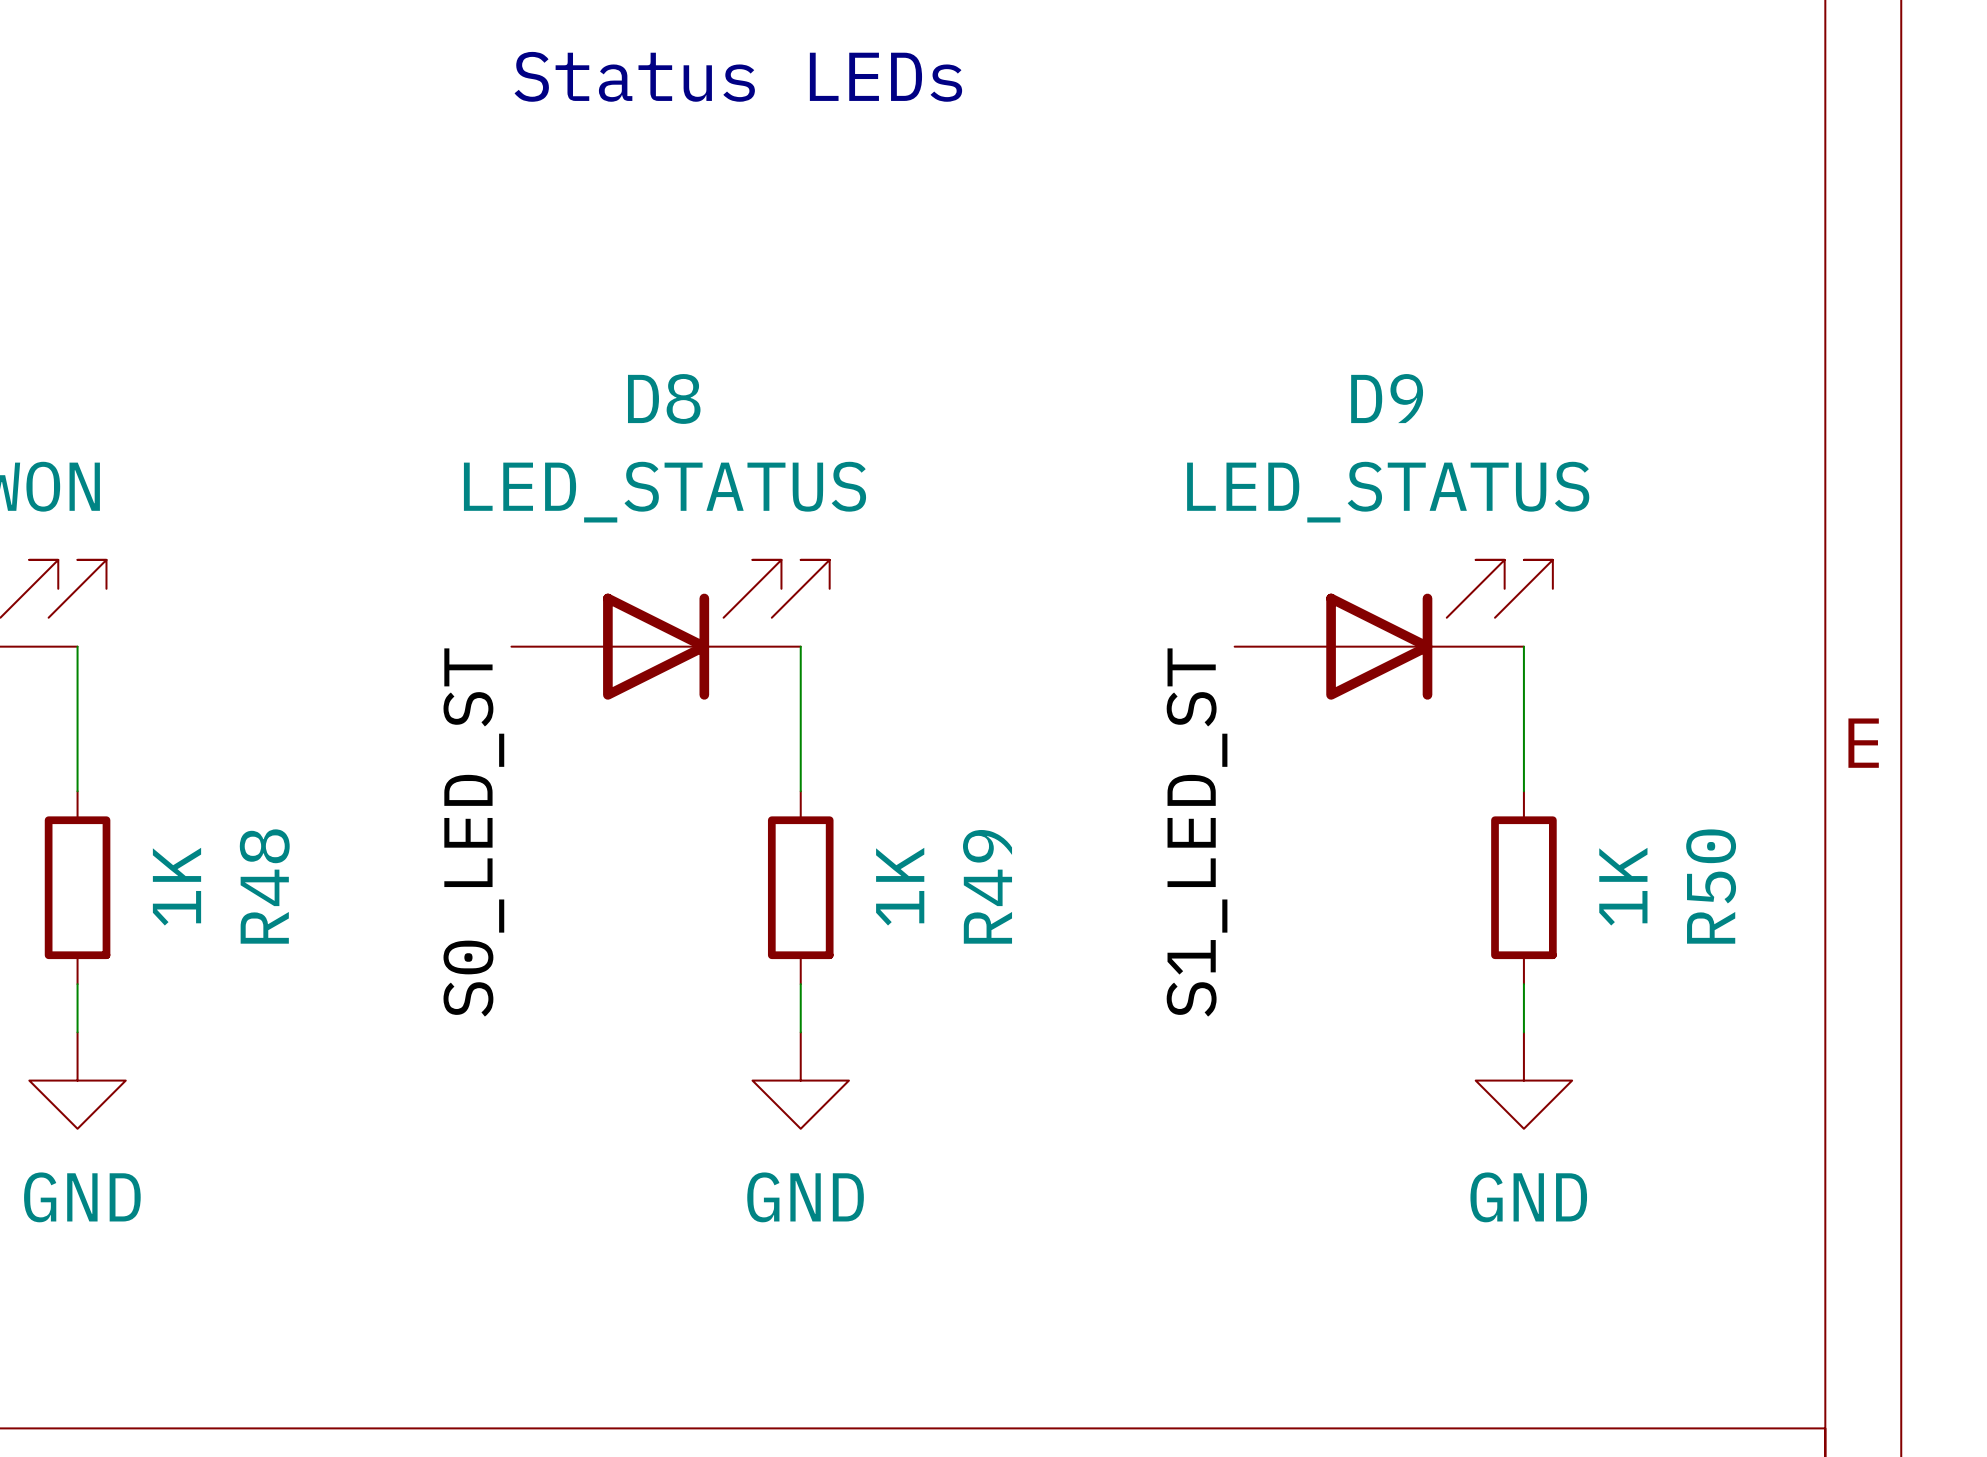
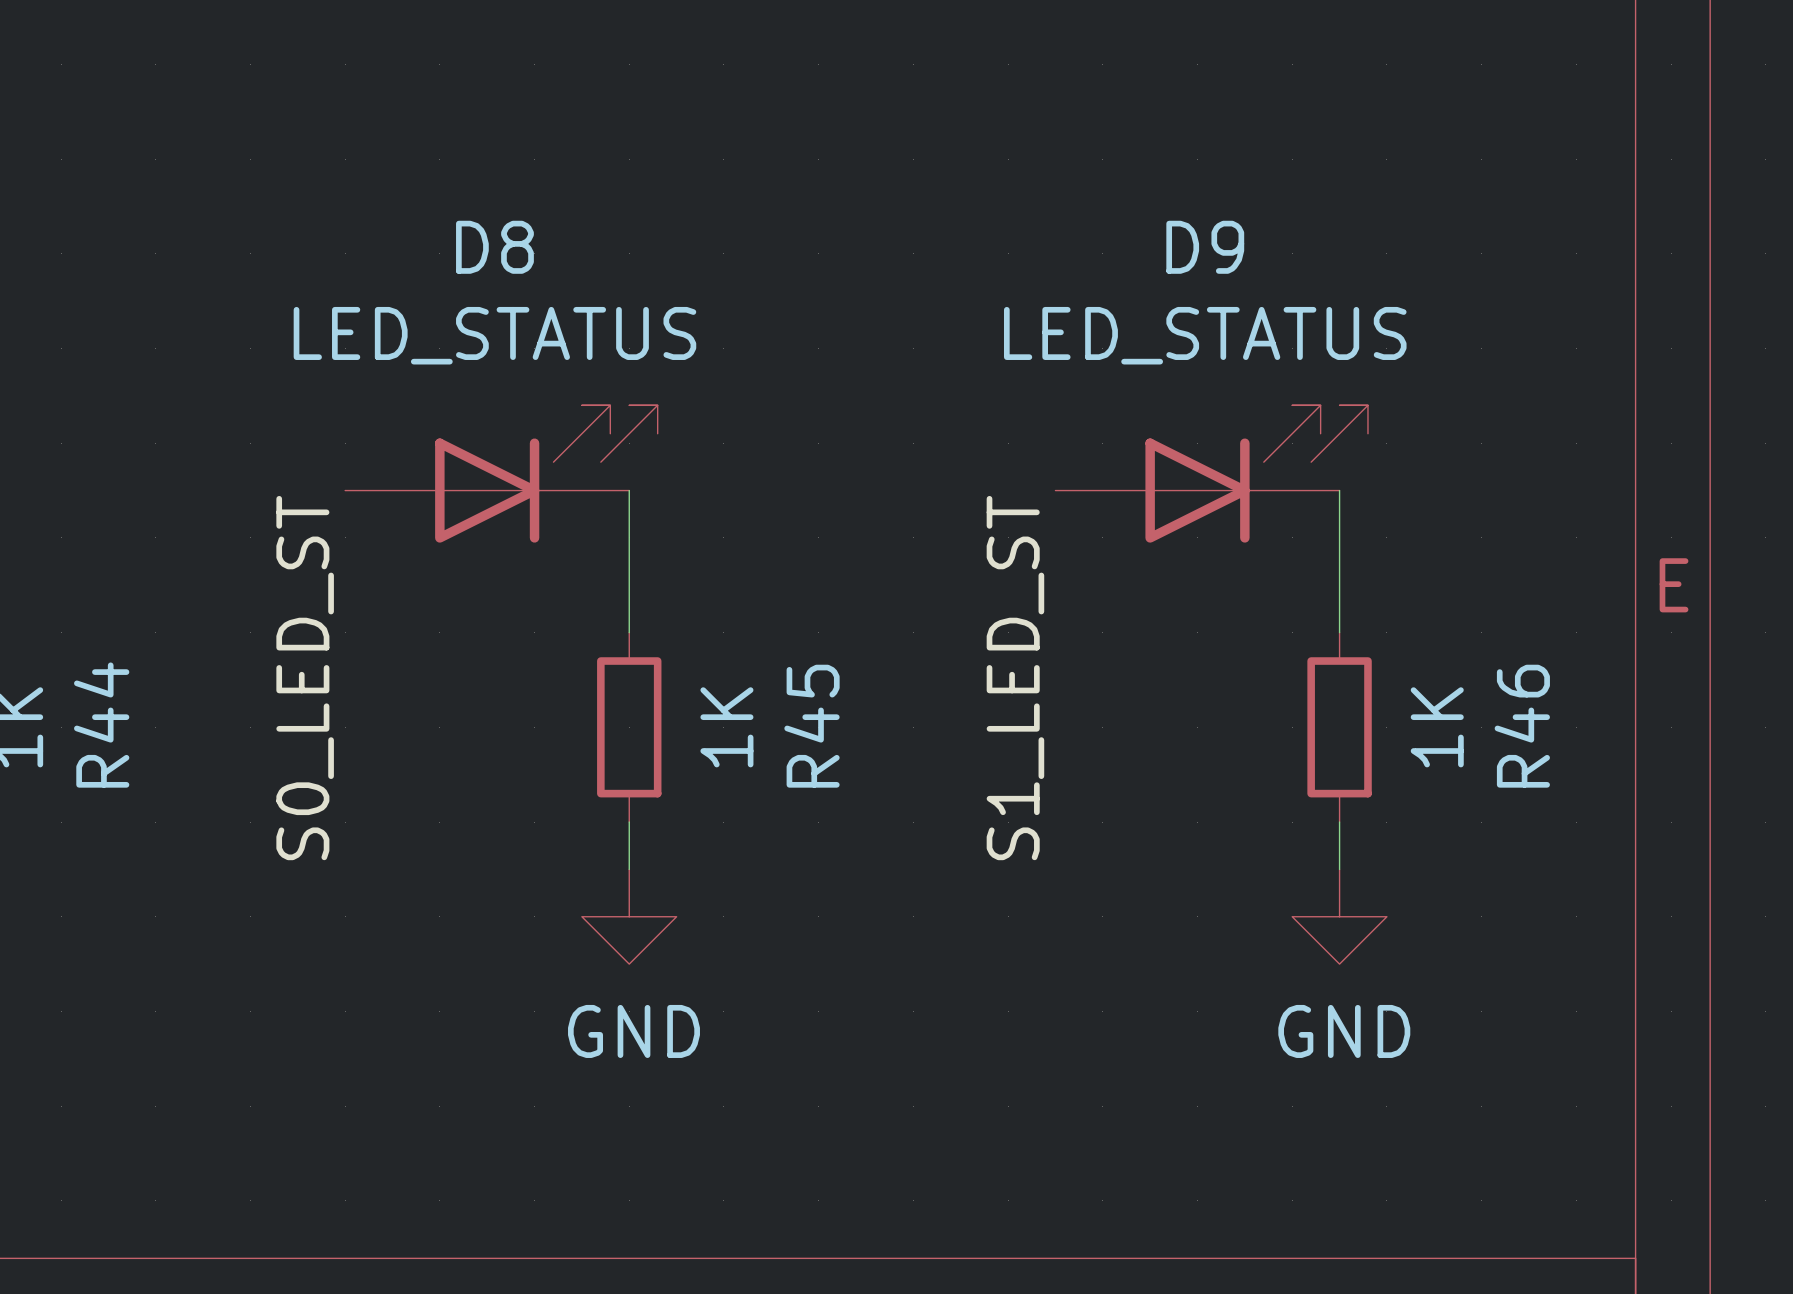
R48 name: R48 (264, 886) -> R44 (101, 725)
R49 name: R49 (987, 886) -> R45 (811, 726)
R50 name: R50 (1711, 886) -> R46 (1522, 726)

